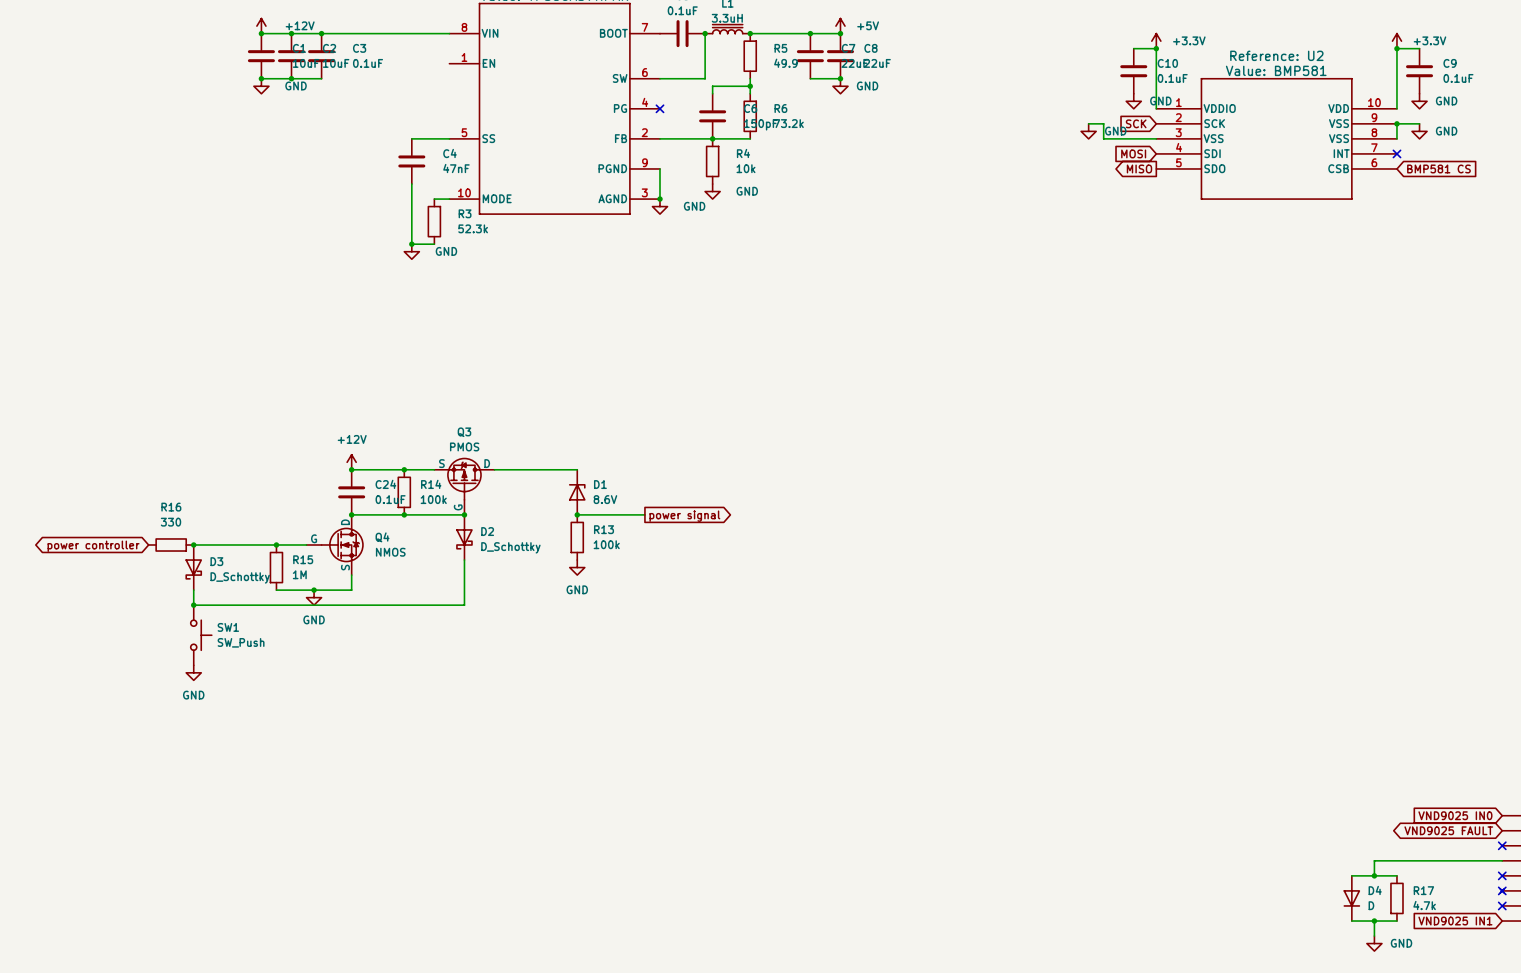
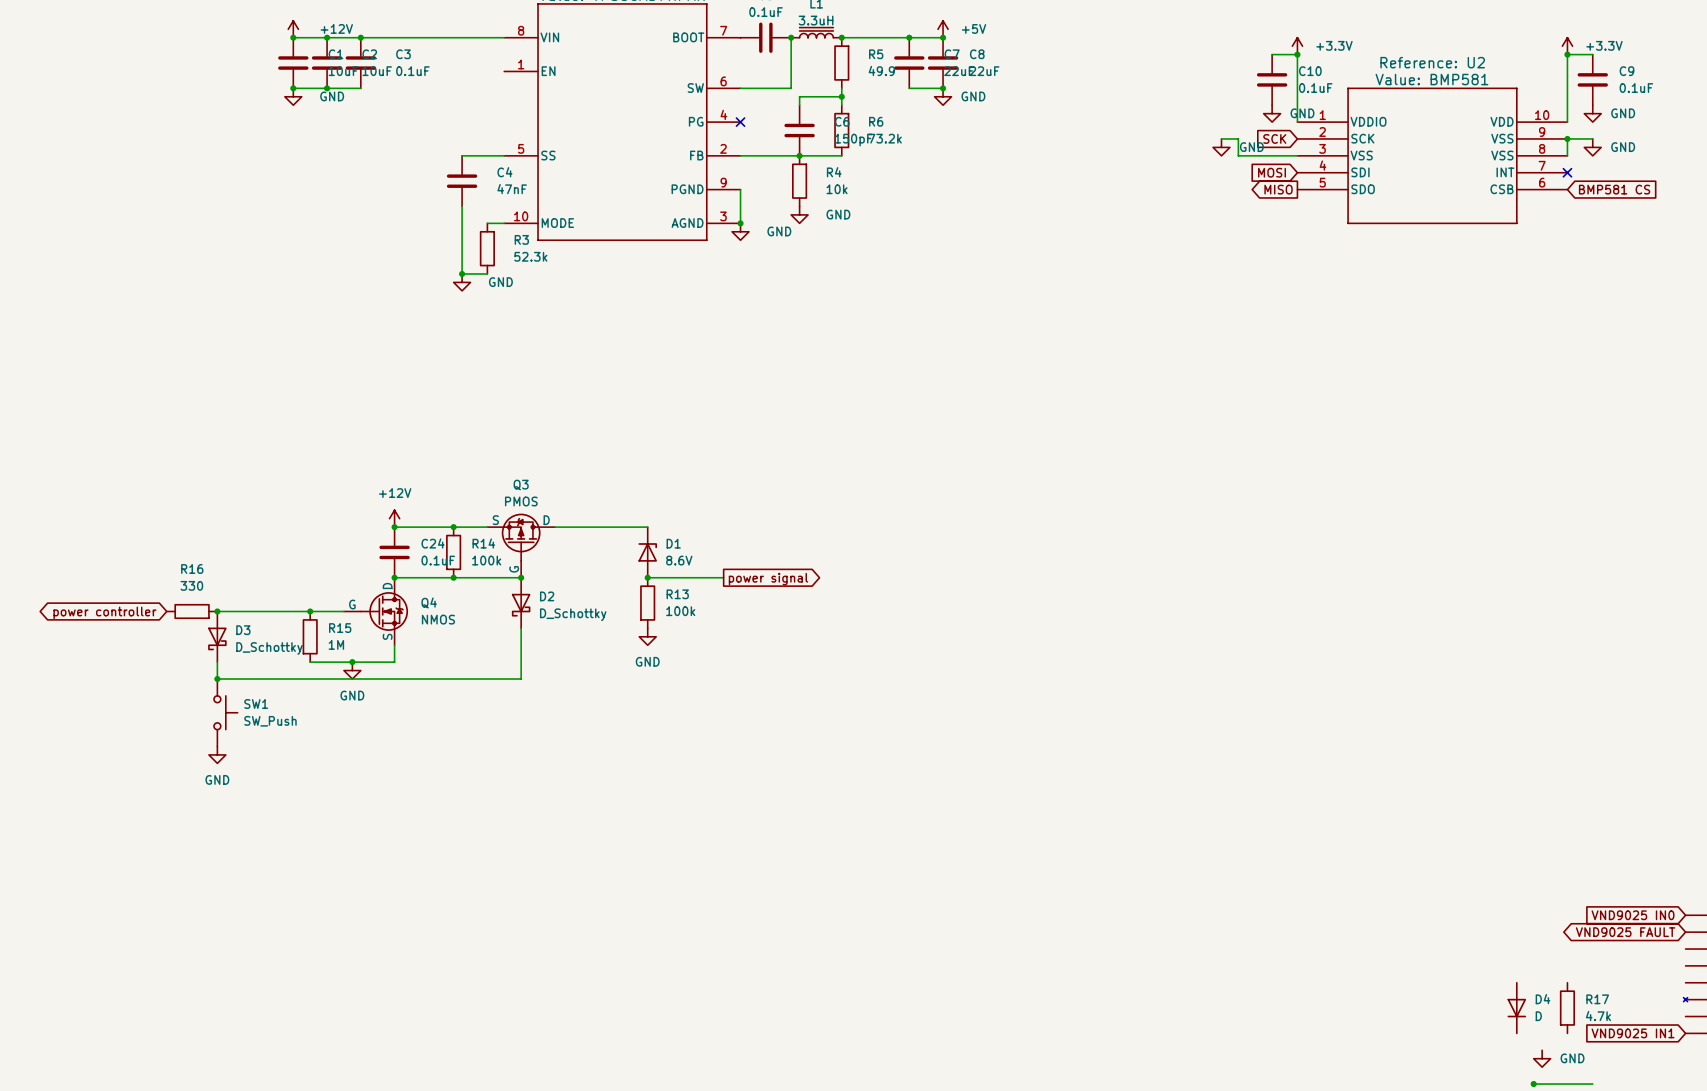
no-connect mark: (1502, 845) -> none
wire: (1502, 860) (1374, 860) (1374, 875) -> none
wire: (1351, 875) (1396, 875) -> none
junction: (1374, 875) -> none
no-connect mark: (1502, 875) -> none
no-connect mark: (1502, 890) -> none
no-connect mark: (1502, 905) -> none
wire: (1351, 921) (1396, 921) -> none
wire: (1374, 921) (1374, 936) -> none
junction: (1374, 921) -> none
wire: none -> (1533, 1084) (1592, 1084)
junction: none -> (1533, 1084)

